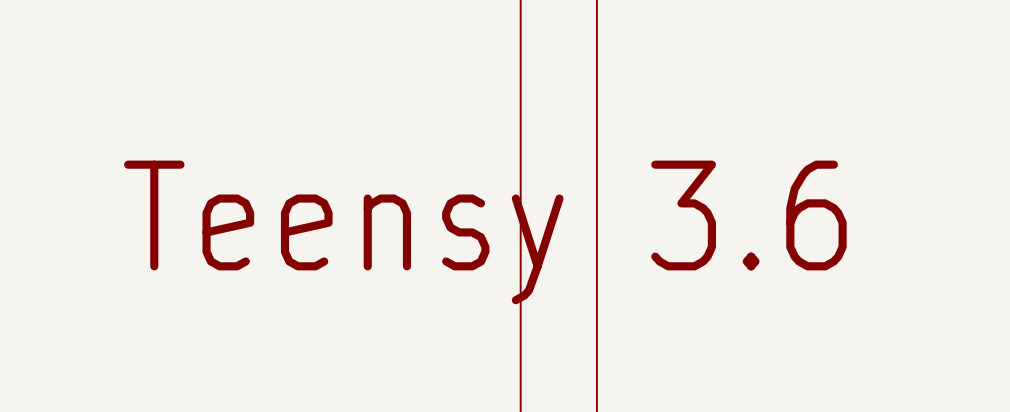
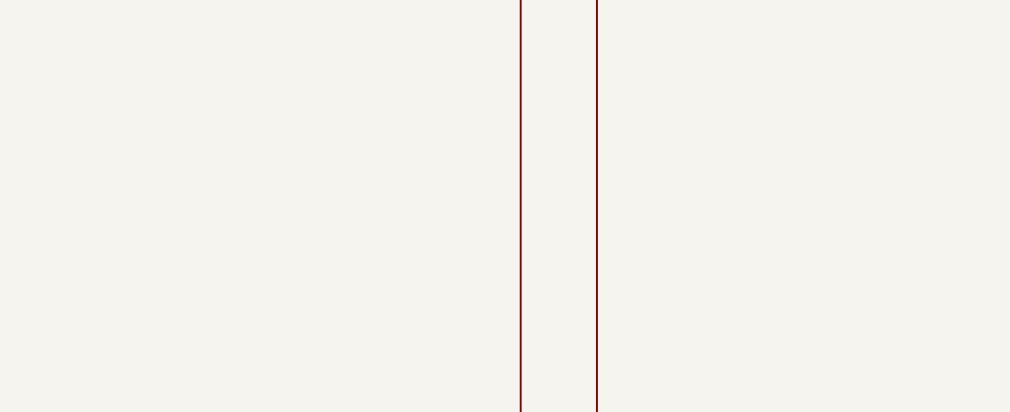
text: Teensy 3.6 (485, 232) -> none

